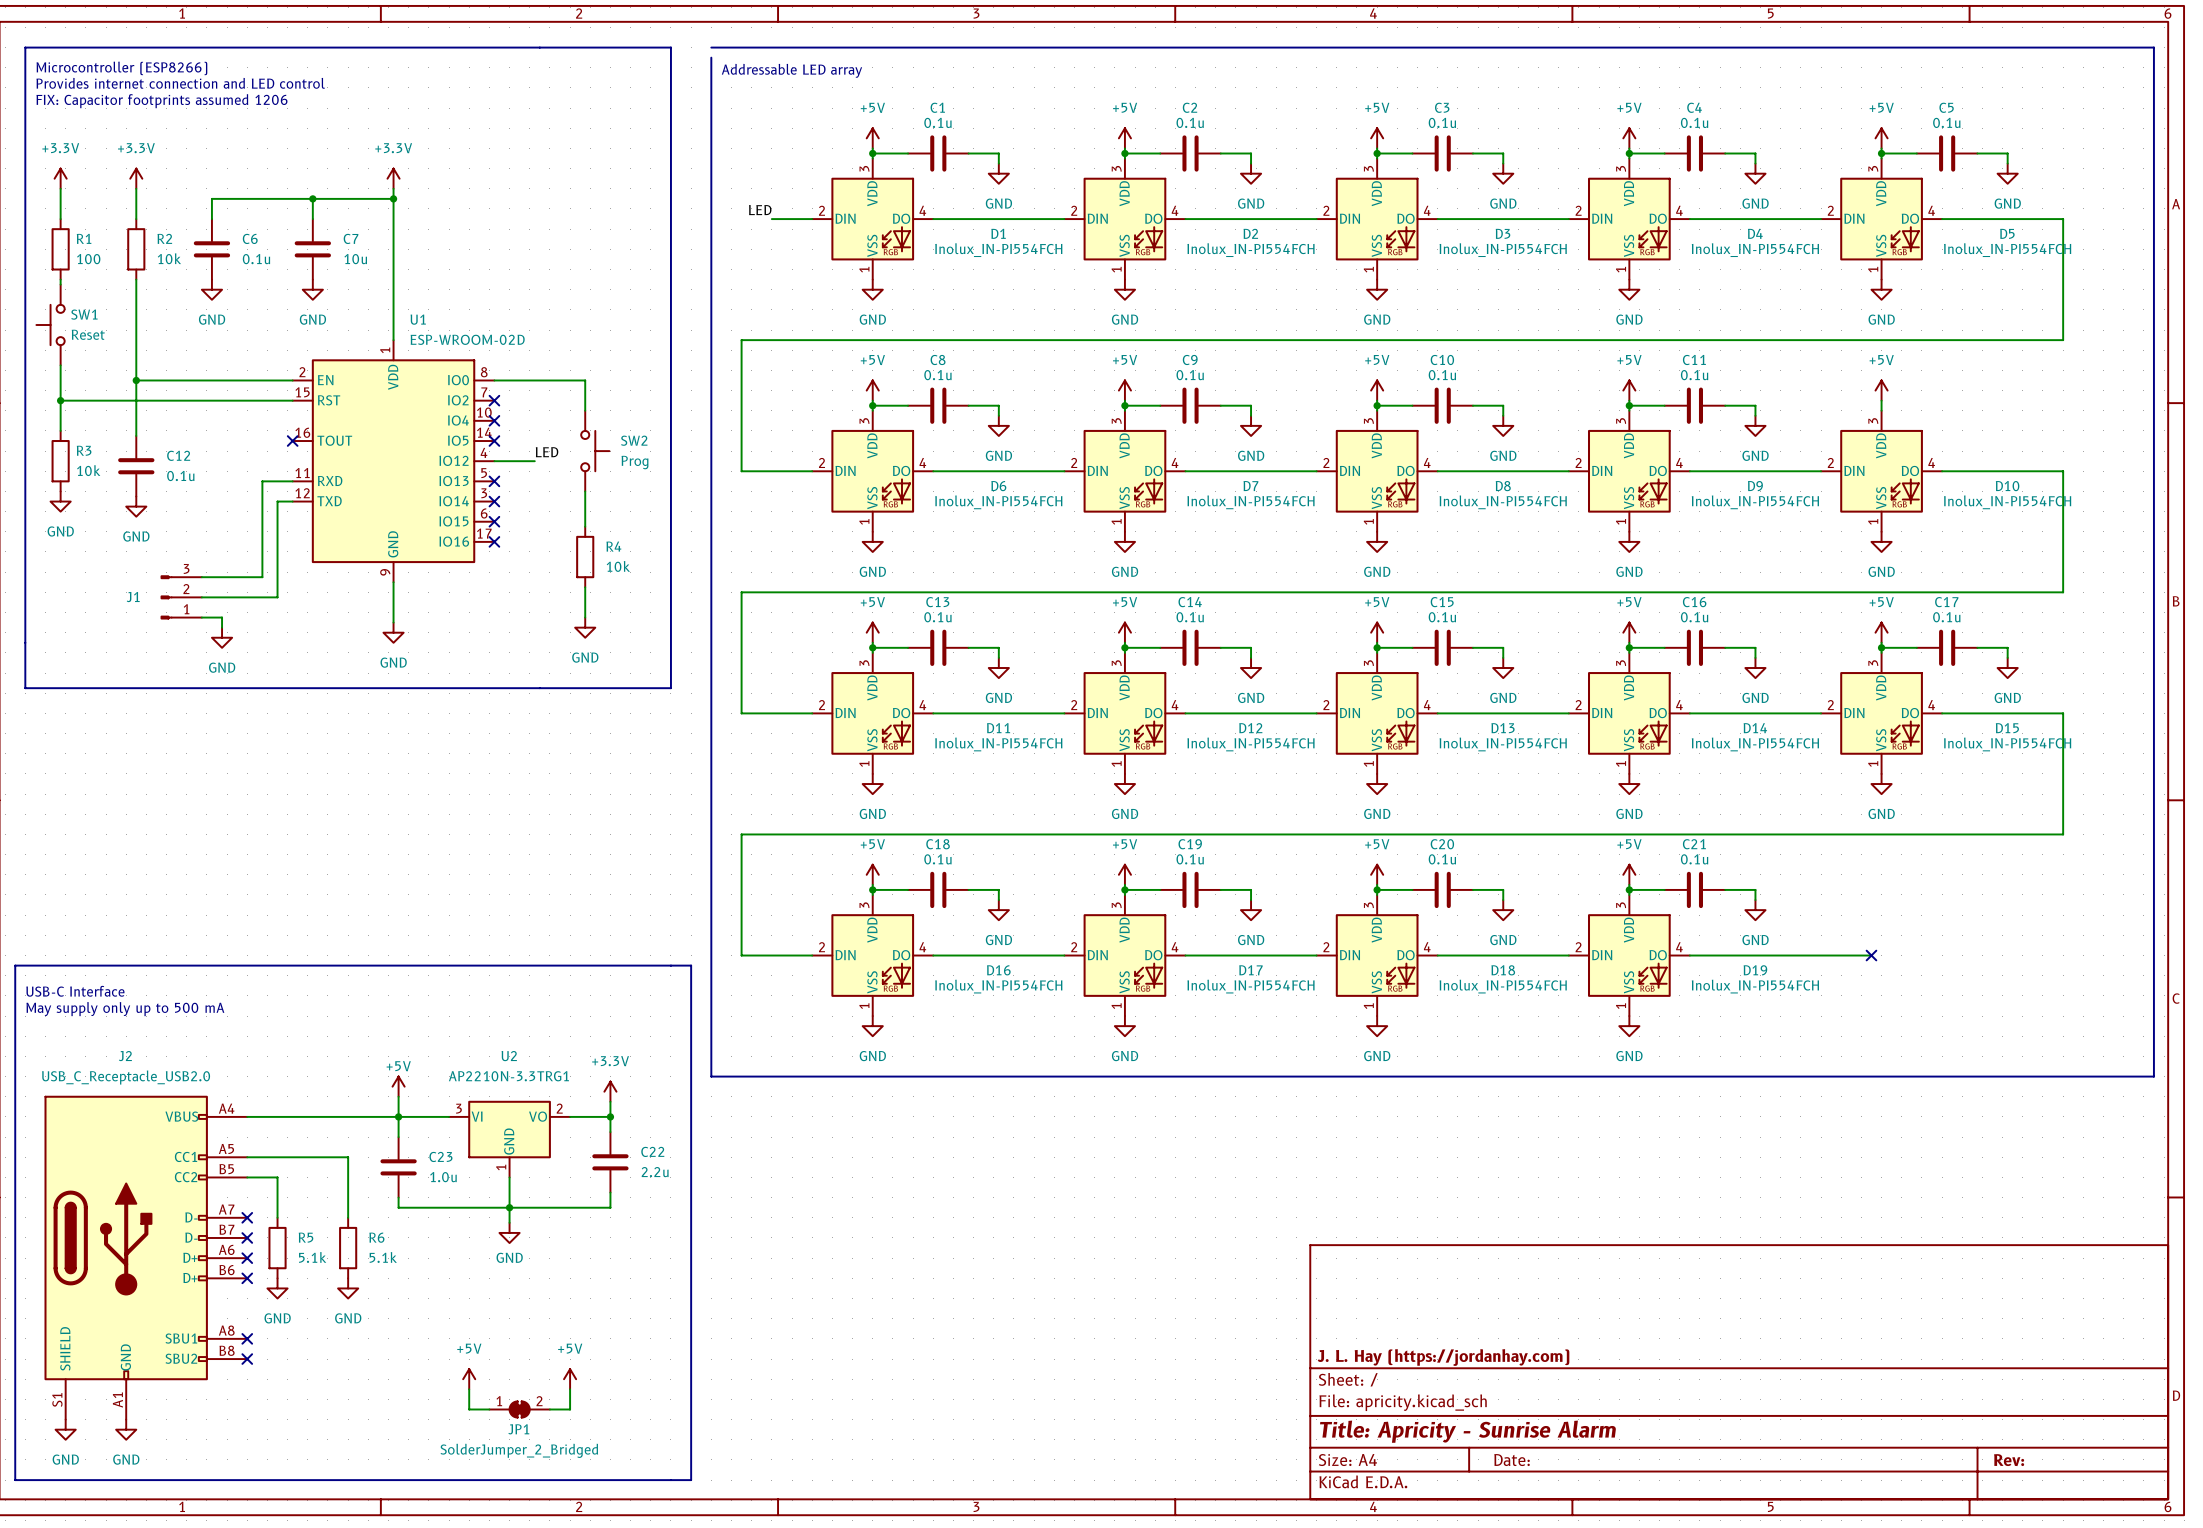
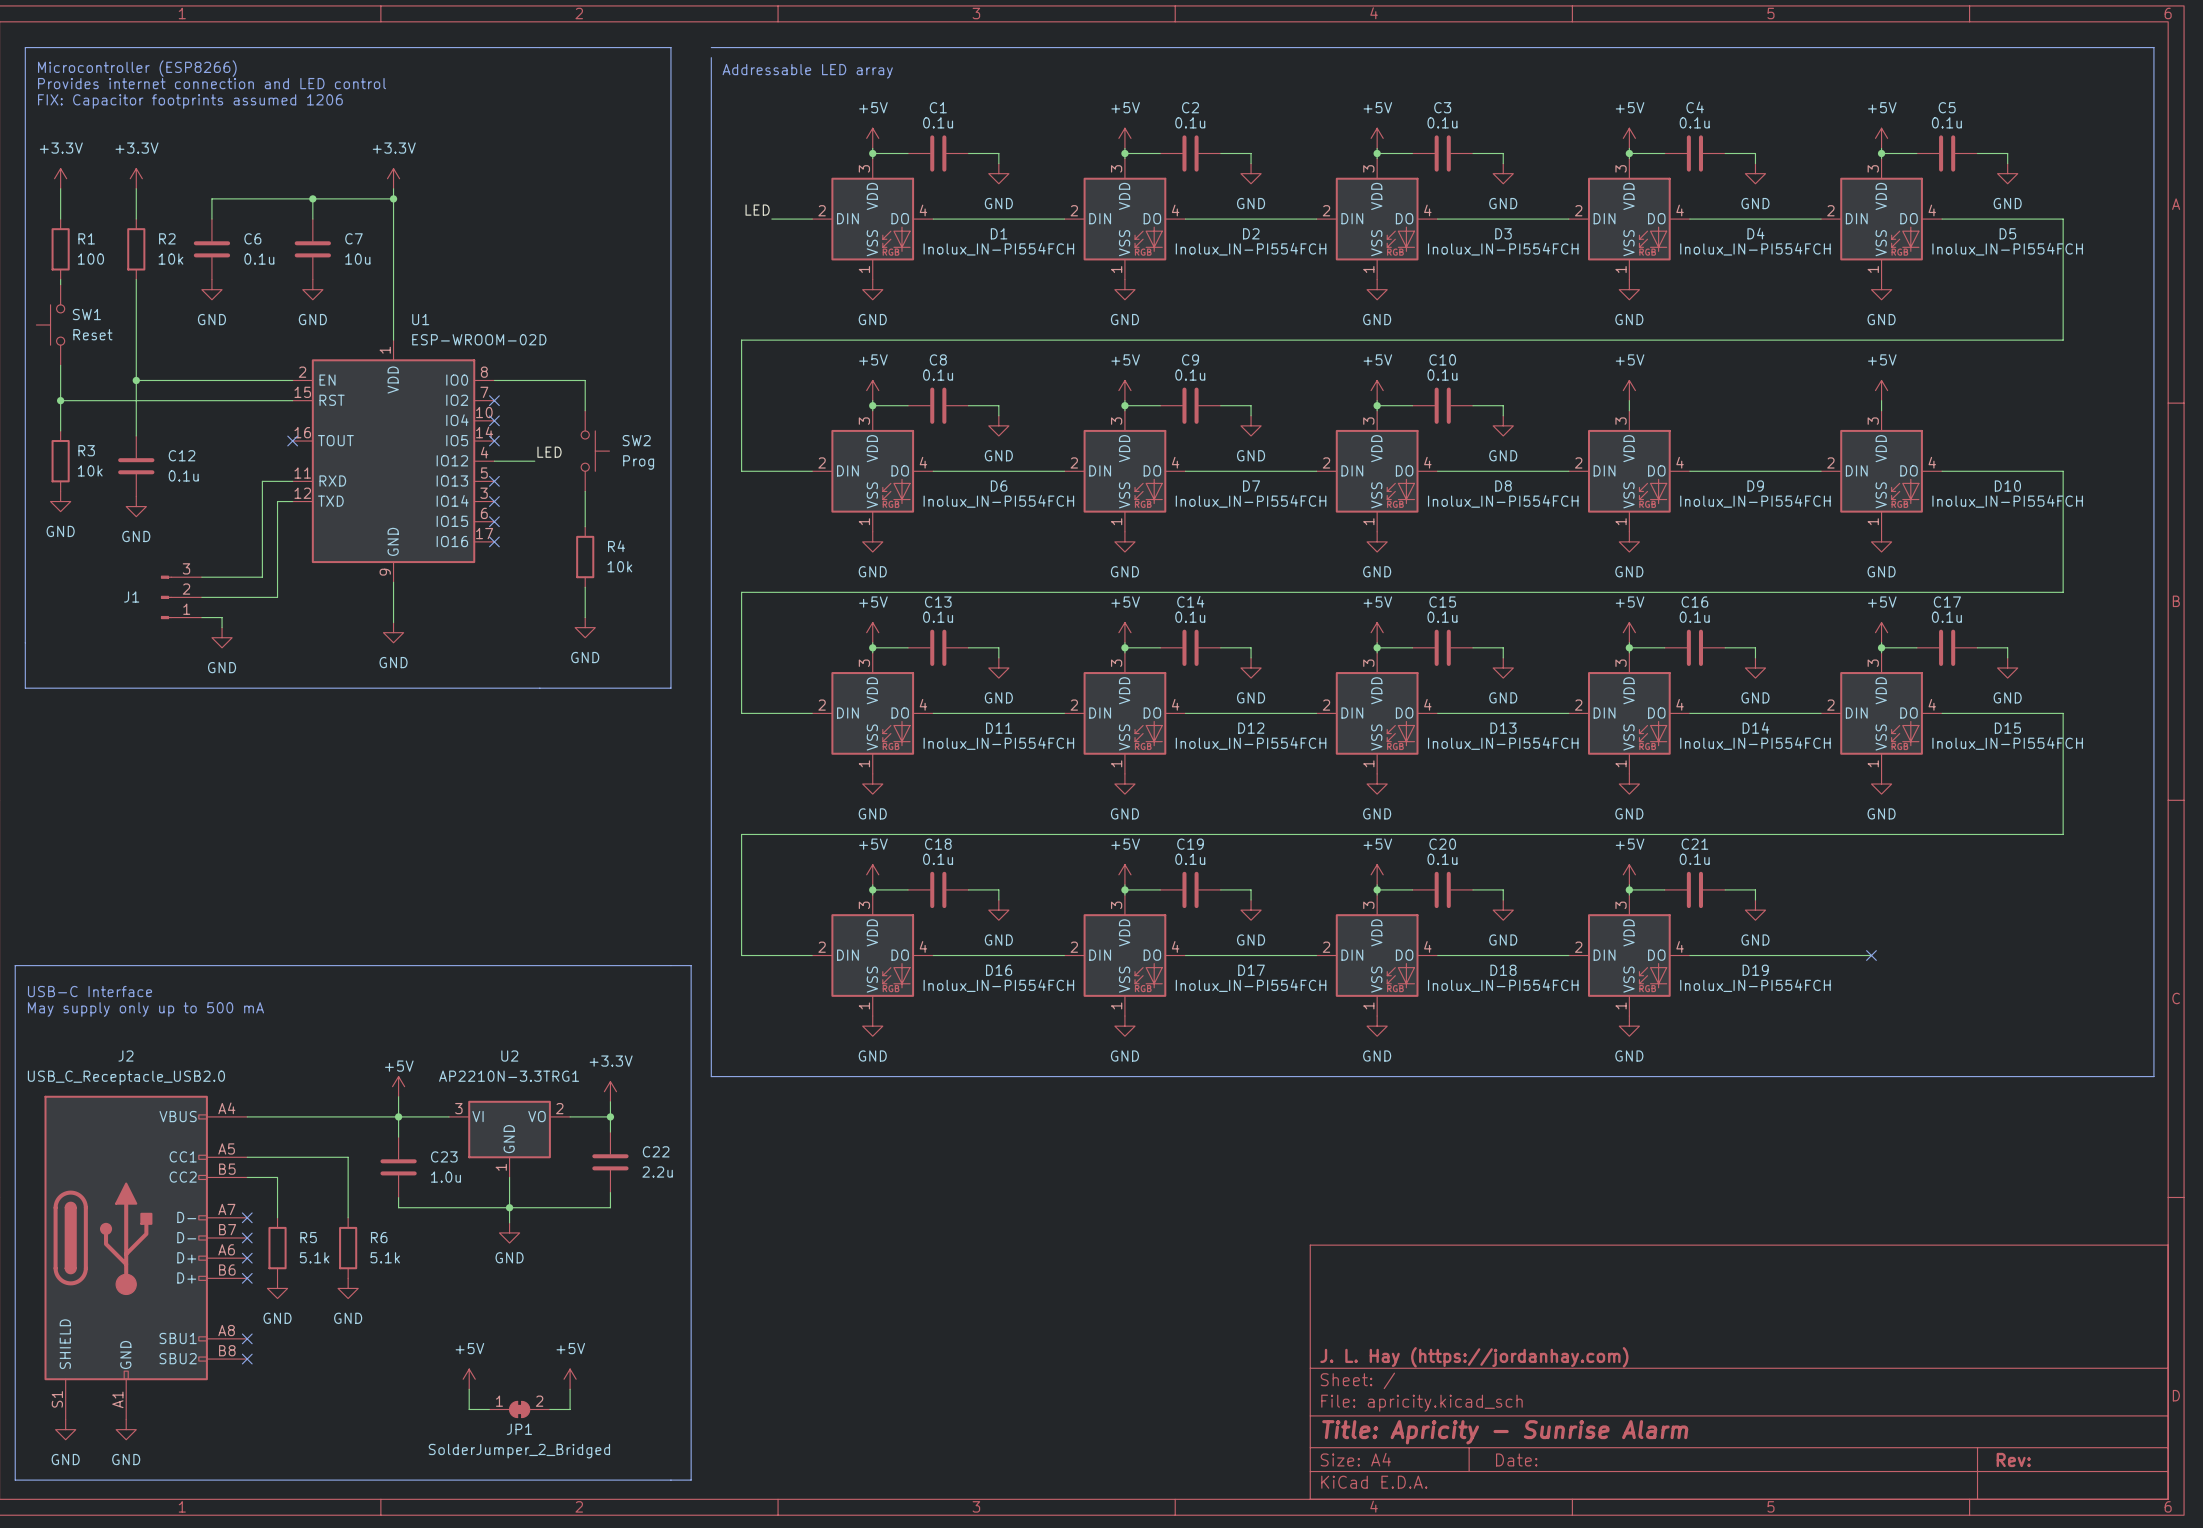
wire: (1629, 405) (1664, 405) -> none
junction: (1629, 405) -> none
C11: 0.1u (1694, 405) -> none
wire: (1725, 405) (1755, 405) (1755, 415) -> none
power symbol: GND (1755, 425) -> none

